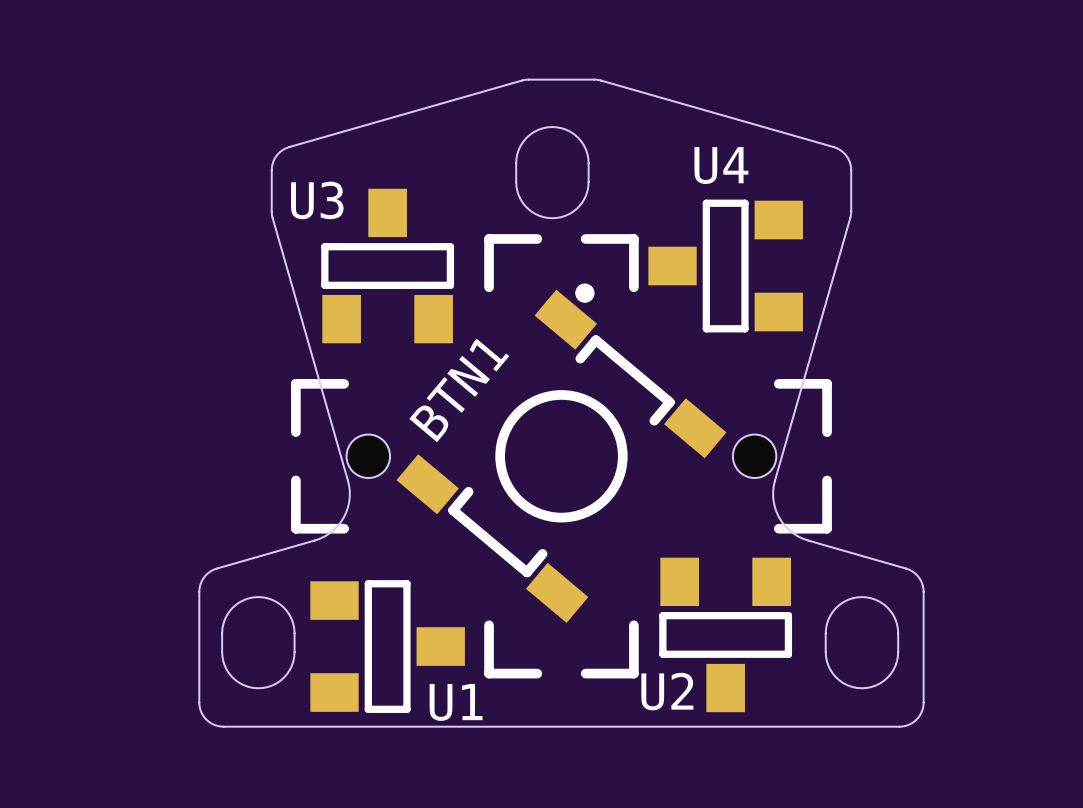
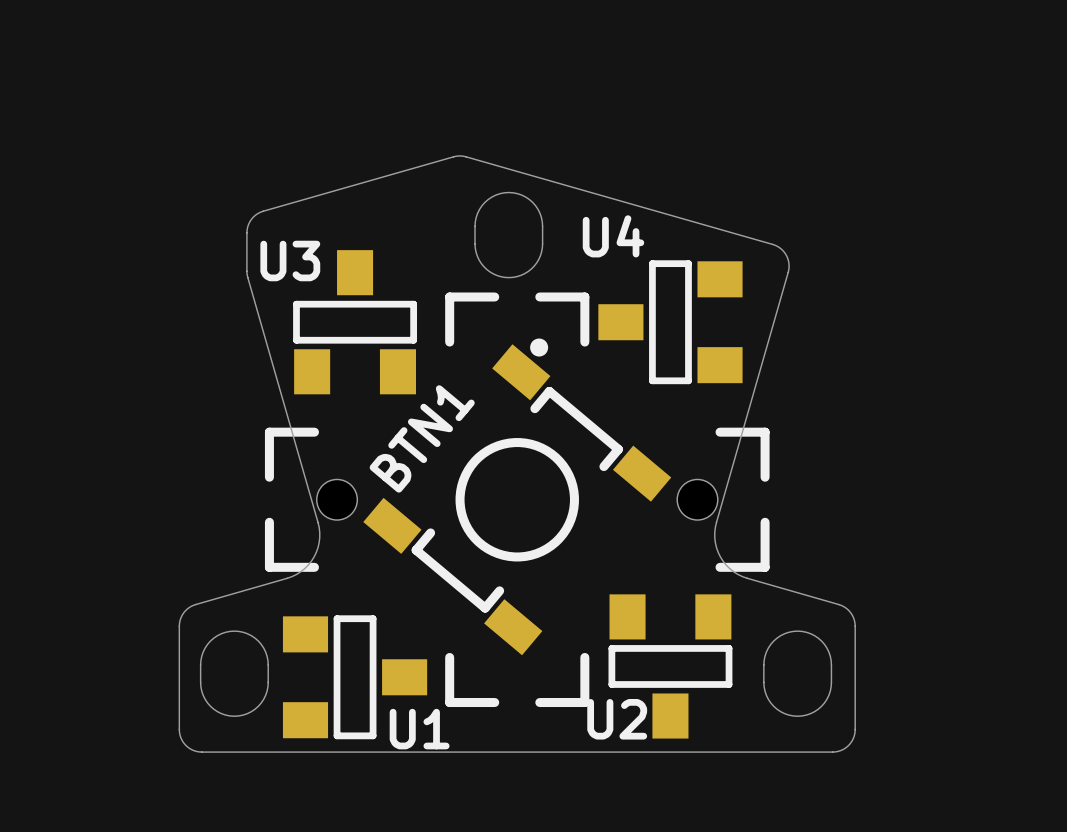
board edge: (522, 80) (599, 80) (836, 148) (846, 155) (851, 167) (850, 218) -> (453, 156) (466, 156) (775, 245) (783, 251) (787, 257) (789, 267) (786, 277)
board edge: (522, 80) (493, 88) -> none
U4 name position: U4 (721, 165) -> U4 (613, 236)

